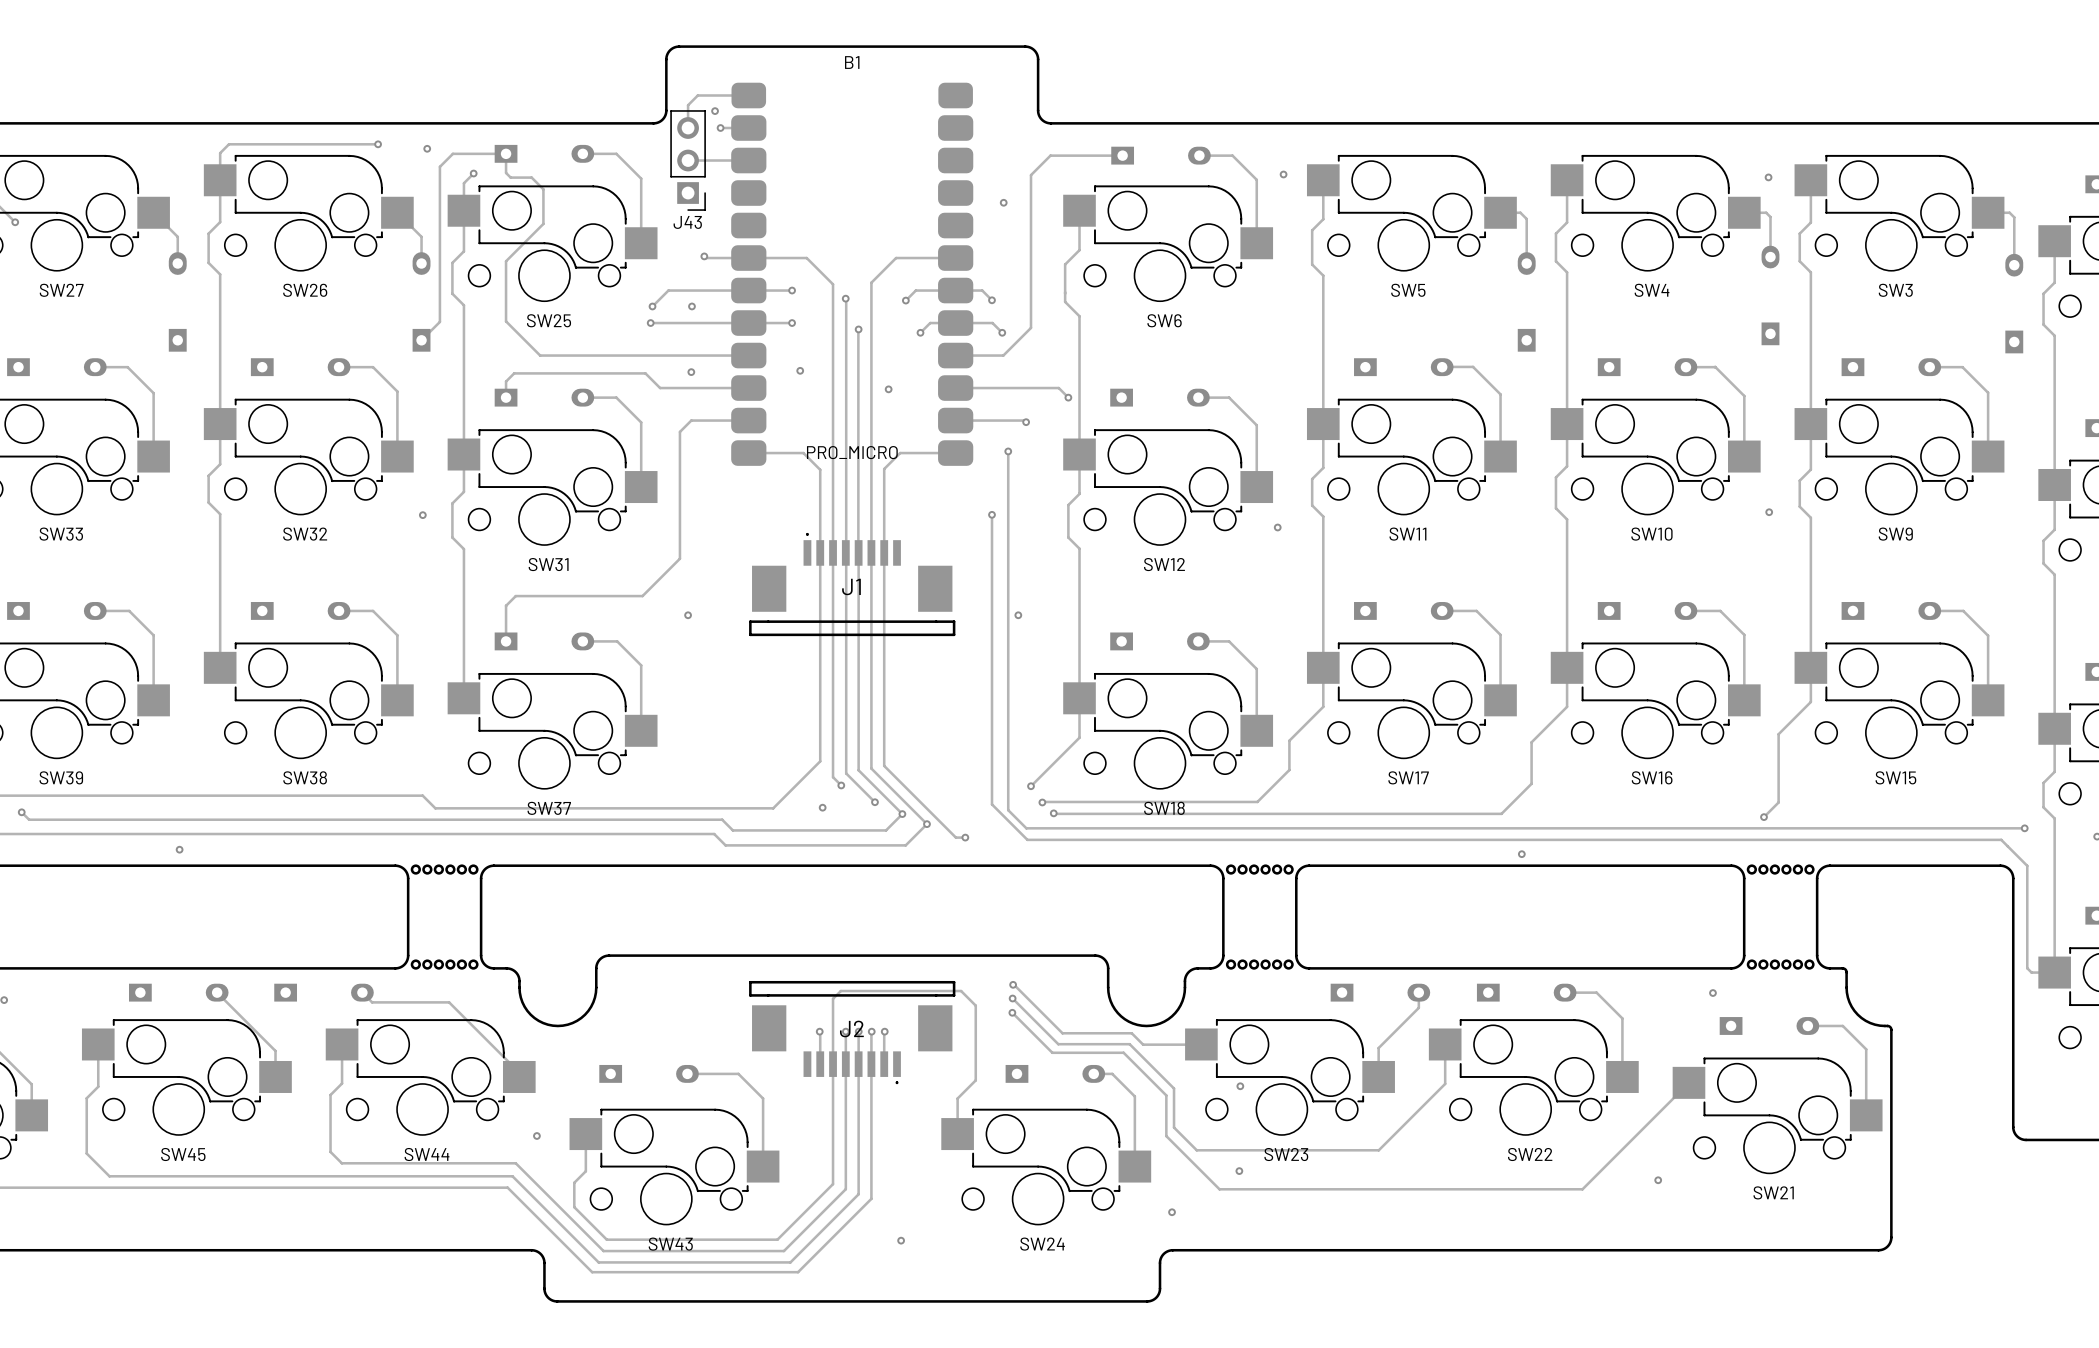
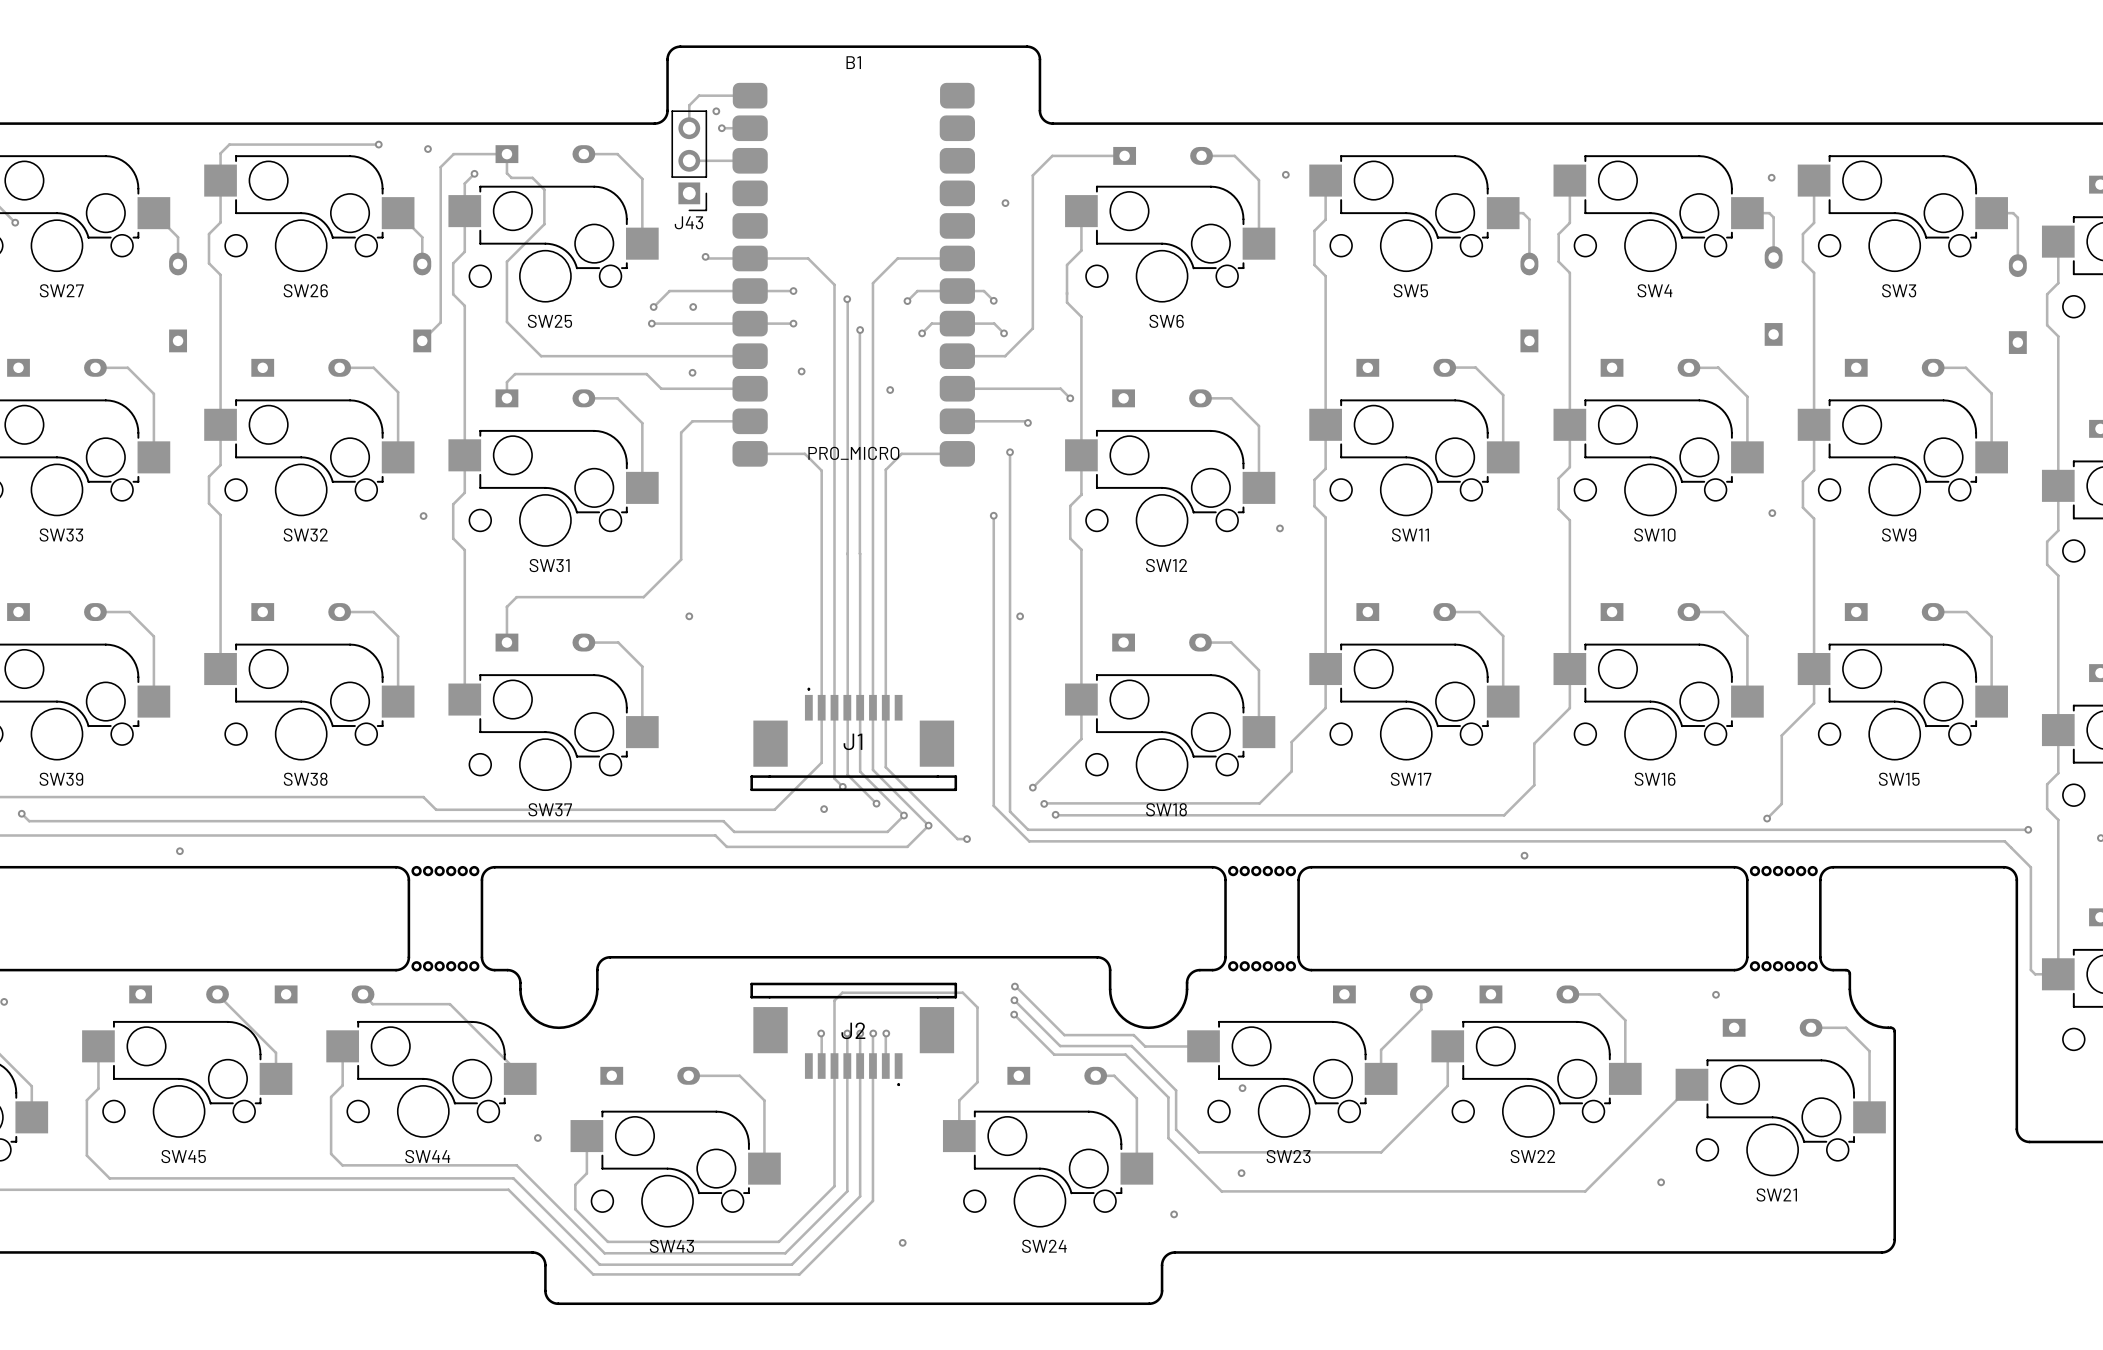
J1 position: (852, 584) -> (853, 739)

